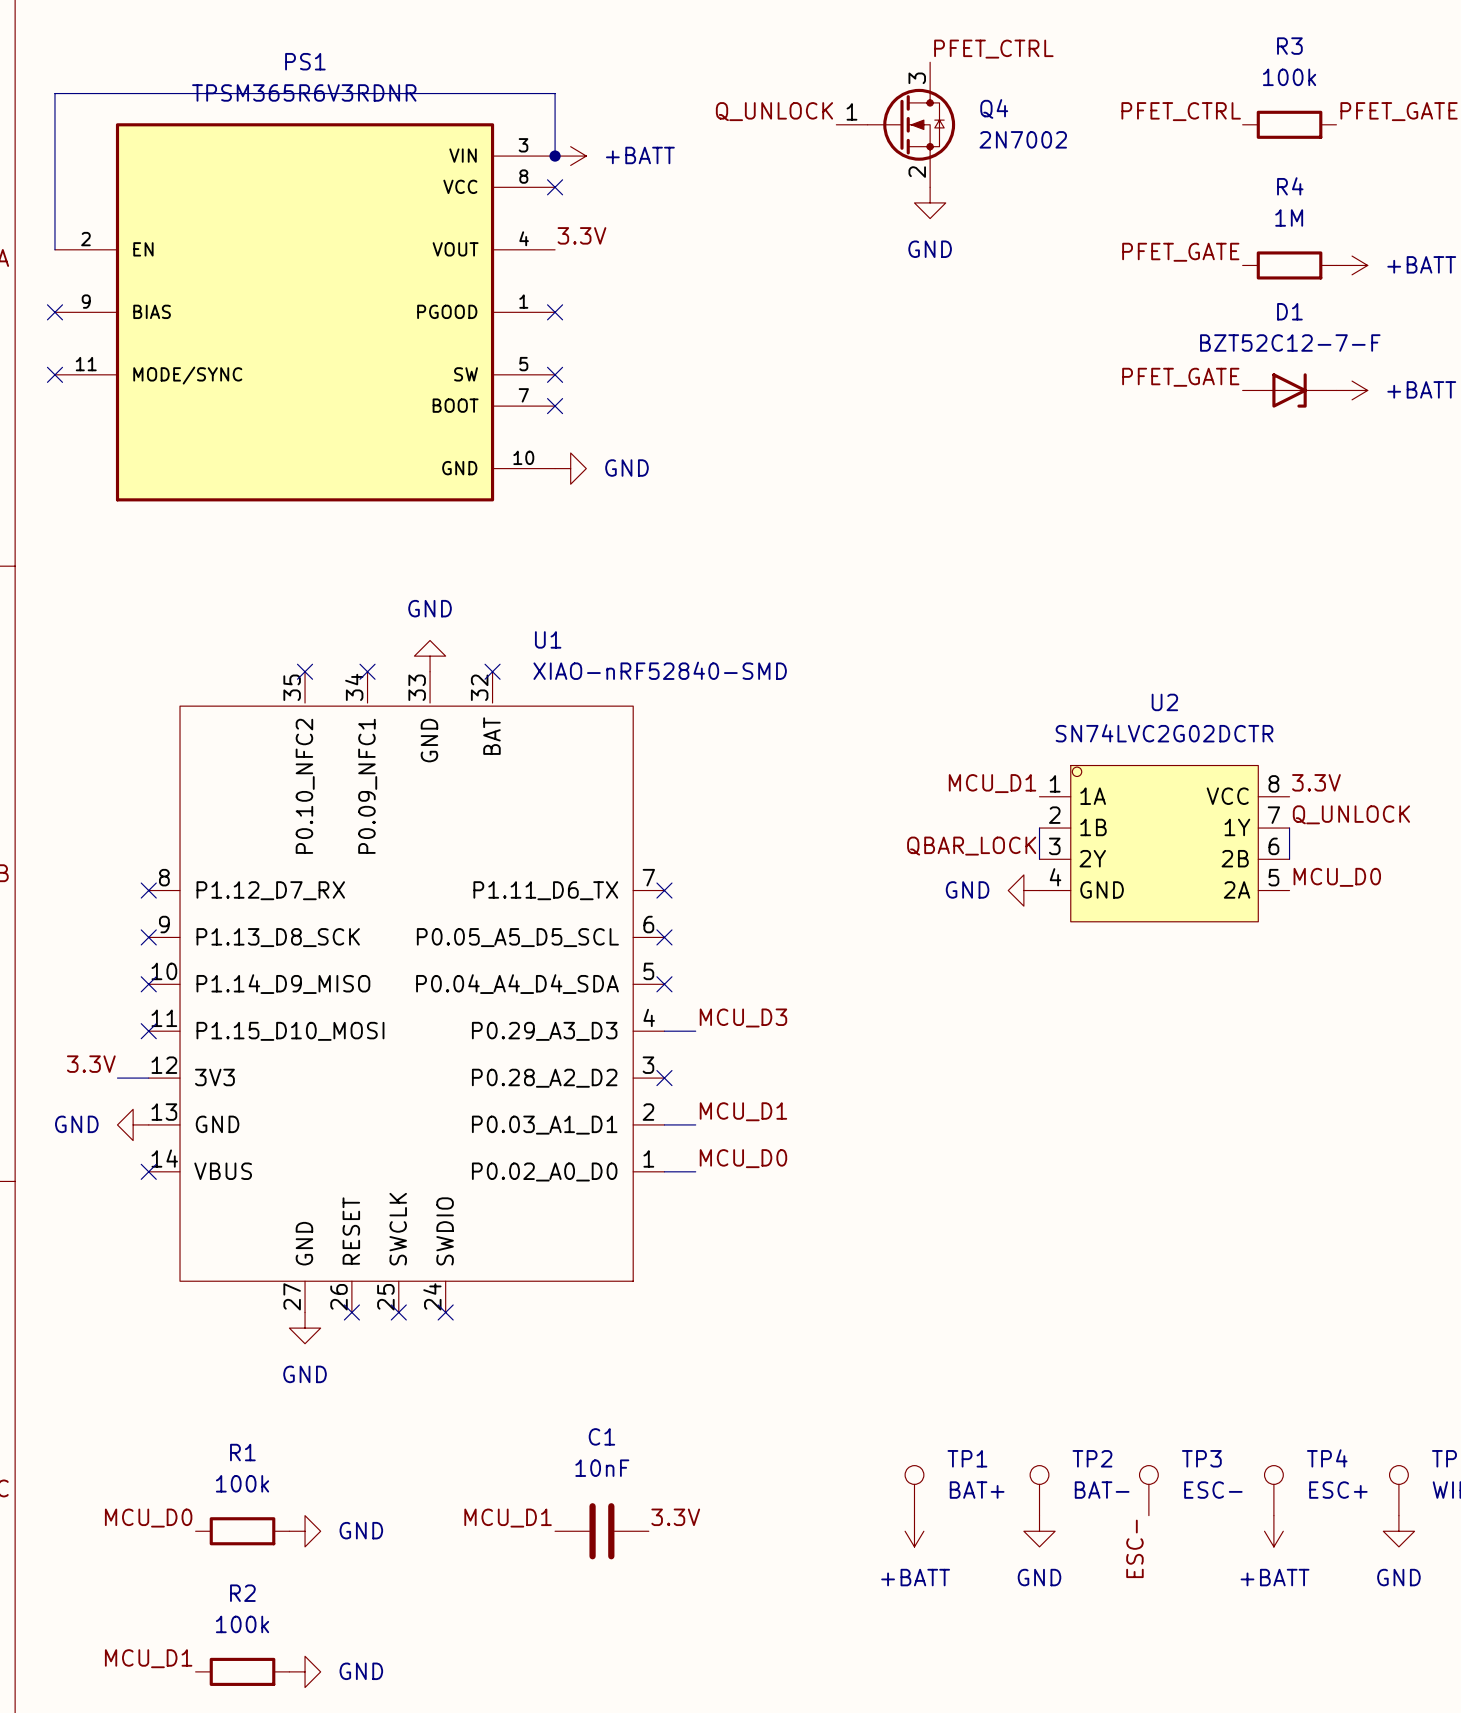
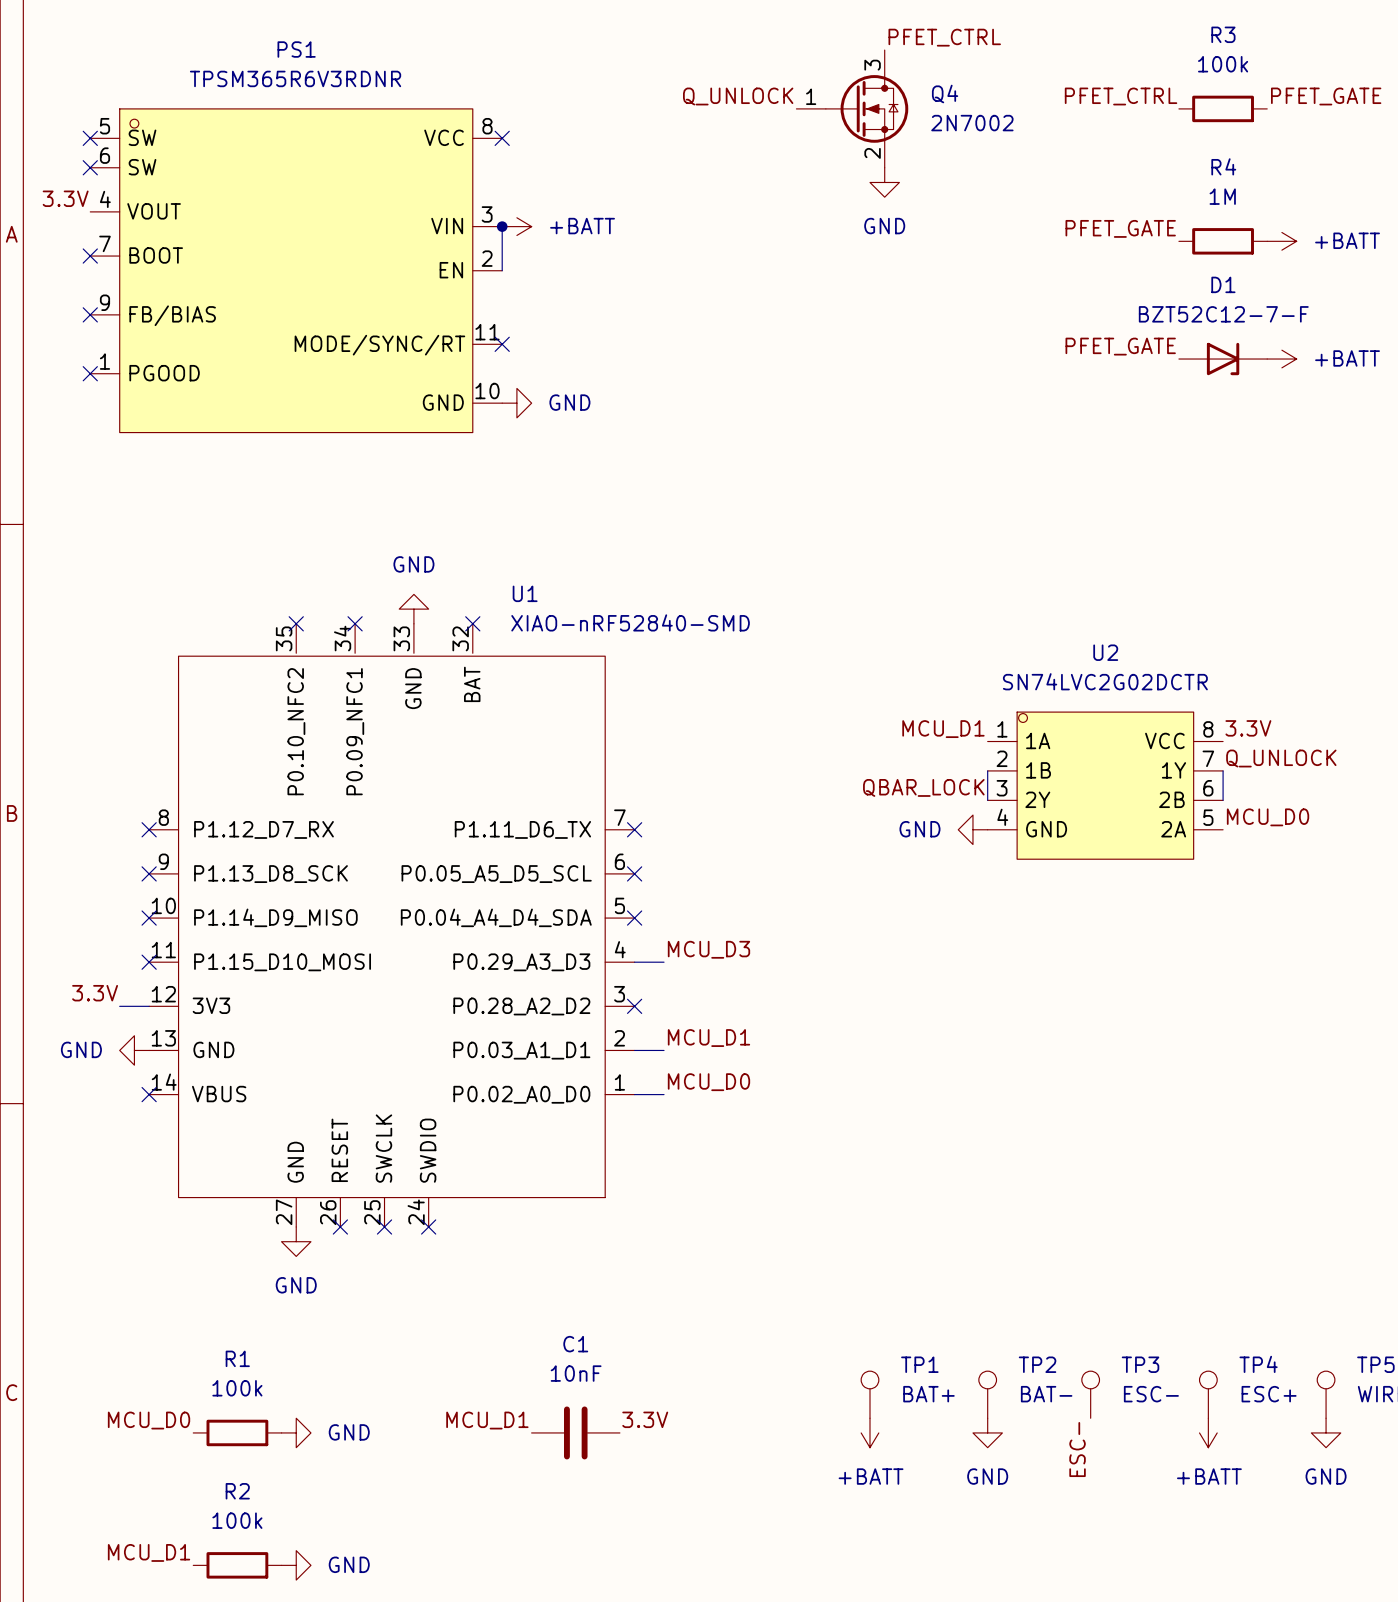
PS1 symbol: [54, 123, 556, 502] -> [90, 108, 503, 433]
no-connect mark: none -> (90, 138)
wire: (555, 156) (555, 93) (54, 93) (54, 249) -> none
junction: (555, 156) -> none
power symbol position: +BATT (570, 156) -> +BATT (516, 226)
no-connect mark: none -> (90, 167)
no-connect mark position: (555, 187) -> (502, 138)
label: none -> 3.3V (65, 198)
label: 3.3V (581, 235) -> none
wire: none -> (502, 226) (502, 270)
junction: none -> (502, 226)
no-connect mark: none -> (90, 256)
no-connect mark: (54, 312) -> none
no-connect mark: (555, 312) -> none
no-connect mark: none -> (90, 314)
no-connect mark: (54, 374) -> none
no-connect mark: none -> (502, 344)
no-connect mark: (555, 374) -> none
no-connect mark: none -> (90, 373)
no-connect mark: (555, 406) -> none
power symbol position: GND (570, 468) -> GND (516, 403)

